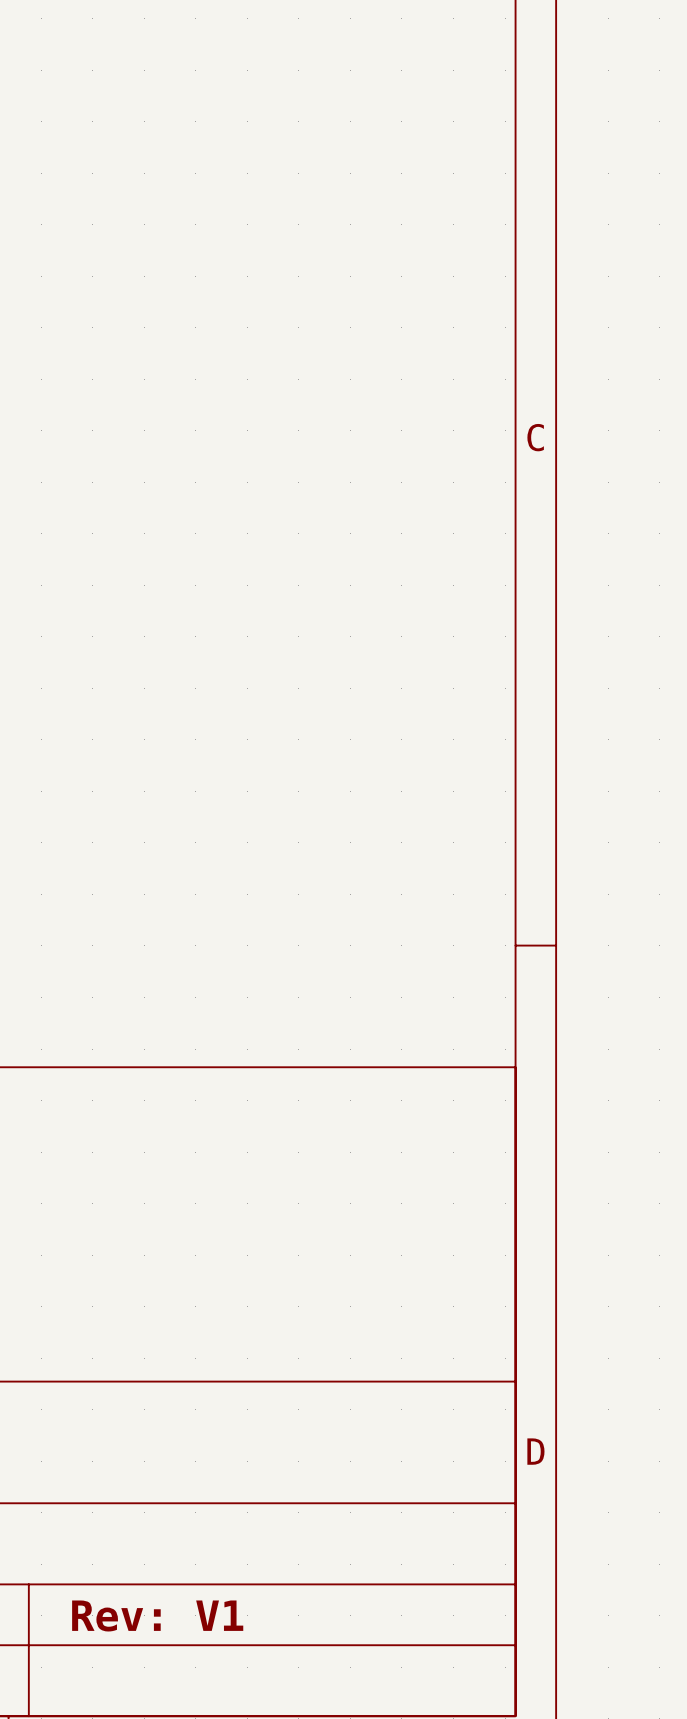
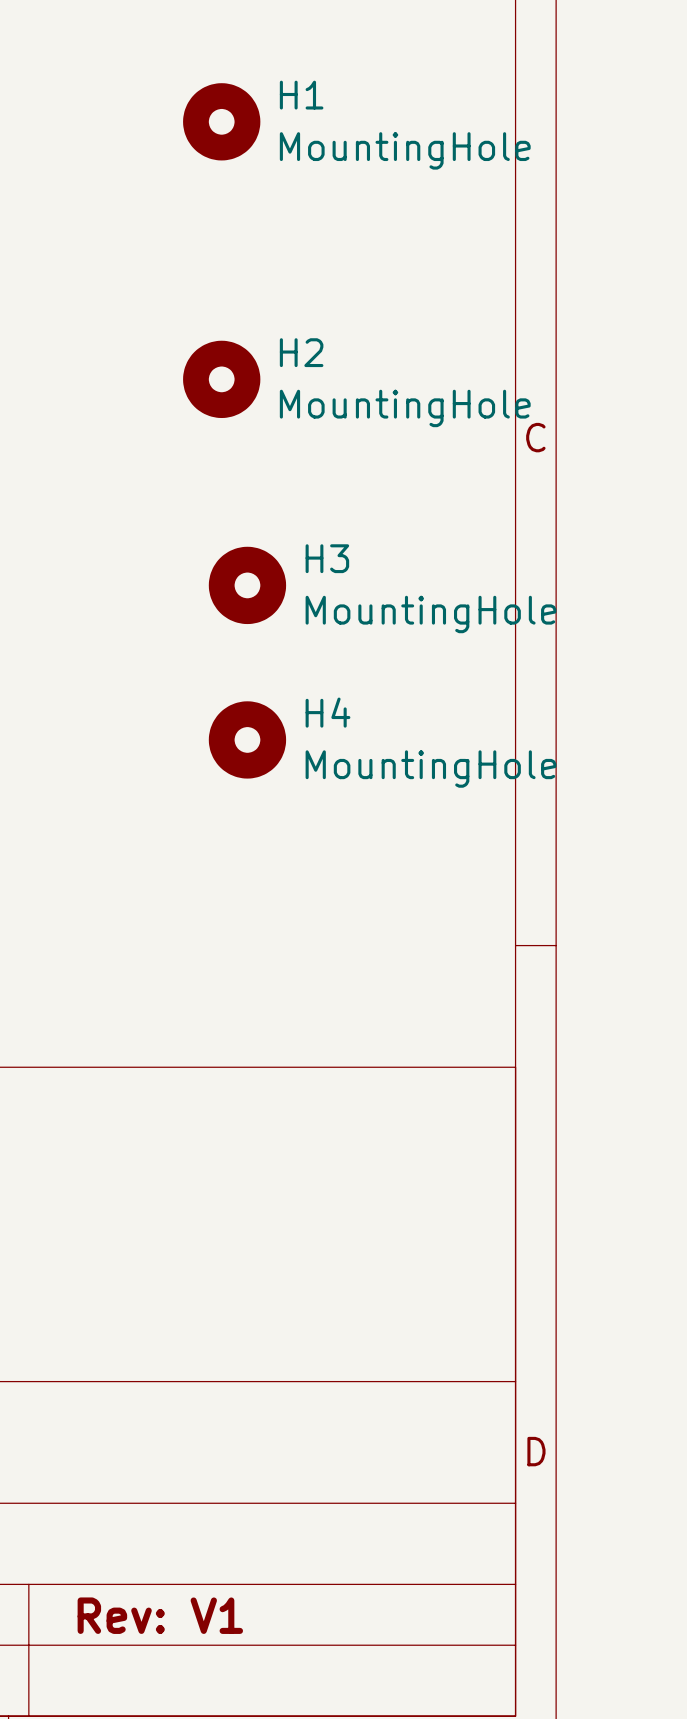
H1: none -> MountingHole (221, 121)
H2: none -> MountingHole (221, 379)
H3: none -> MountingHole (247, 585)
H4: none -> MountingHole (247, 739)

